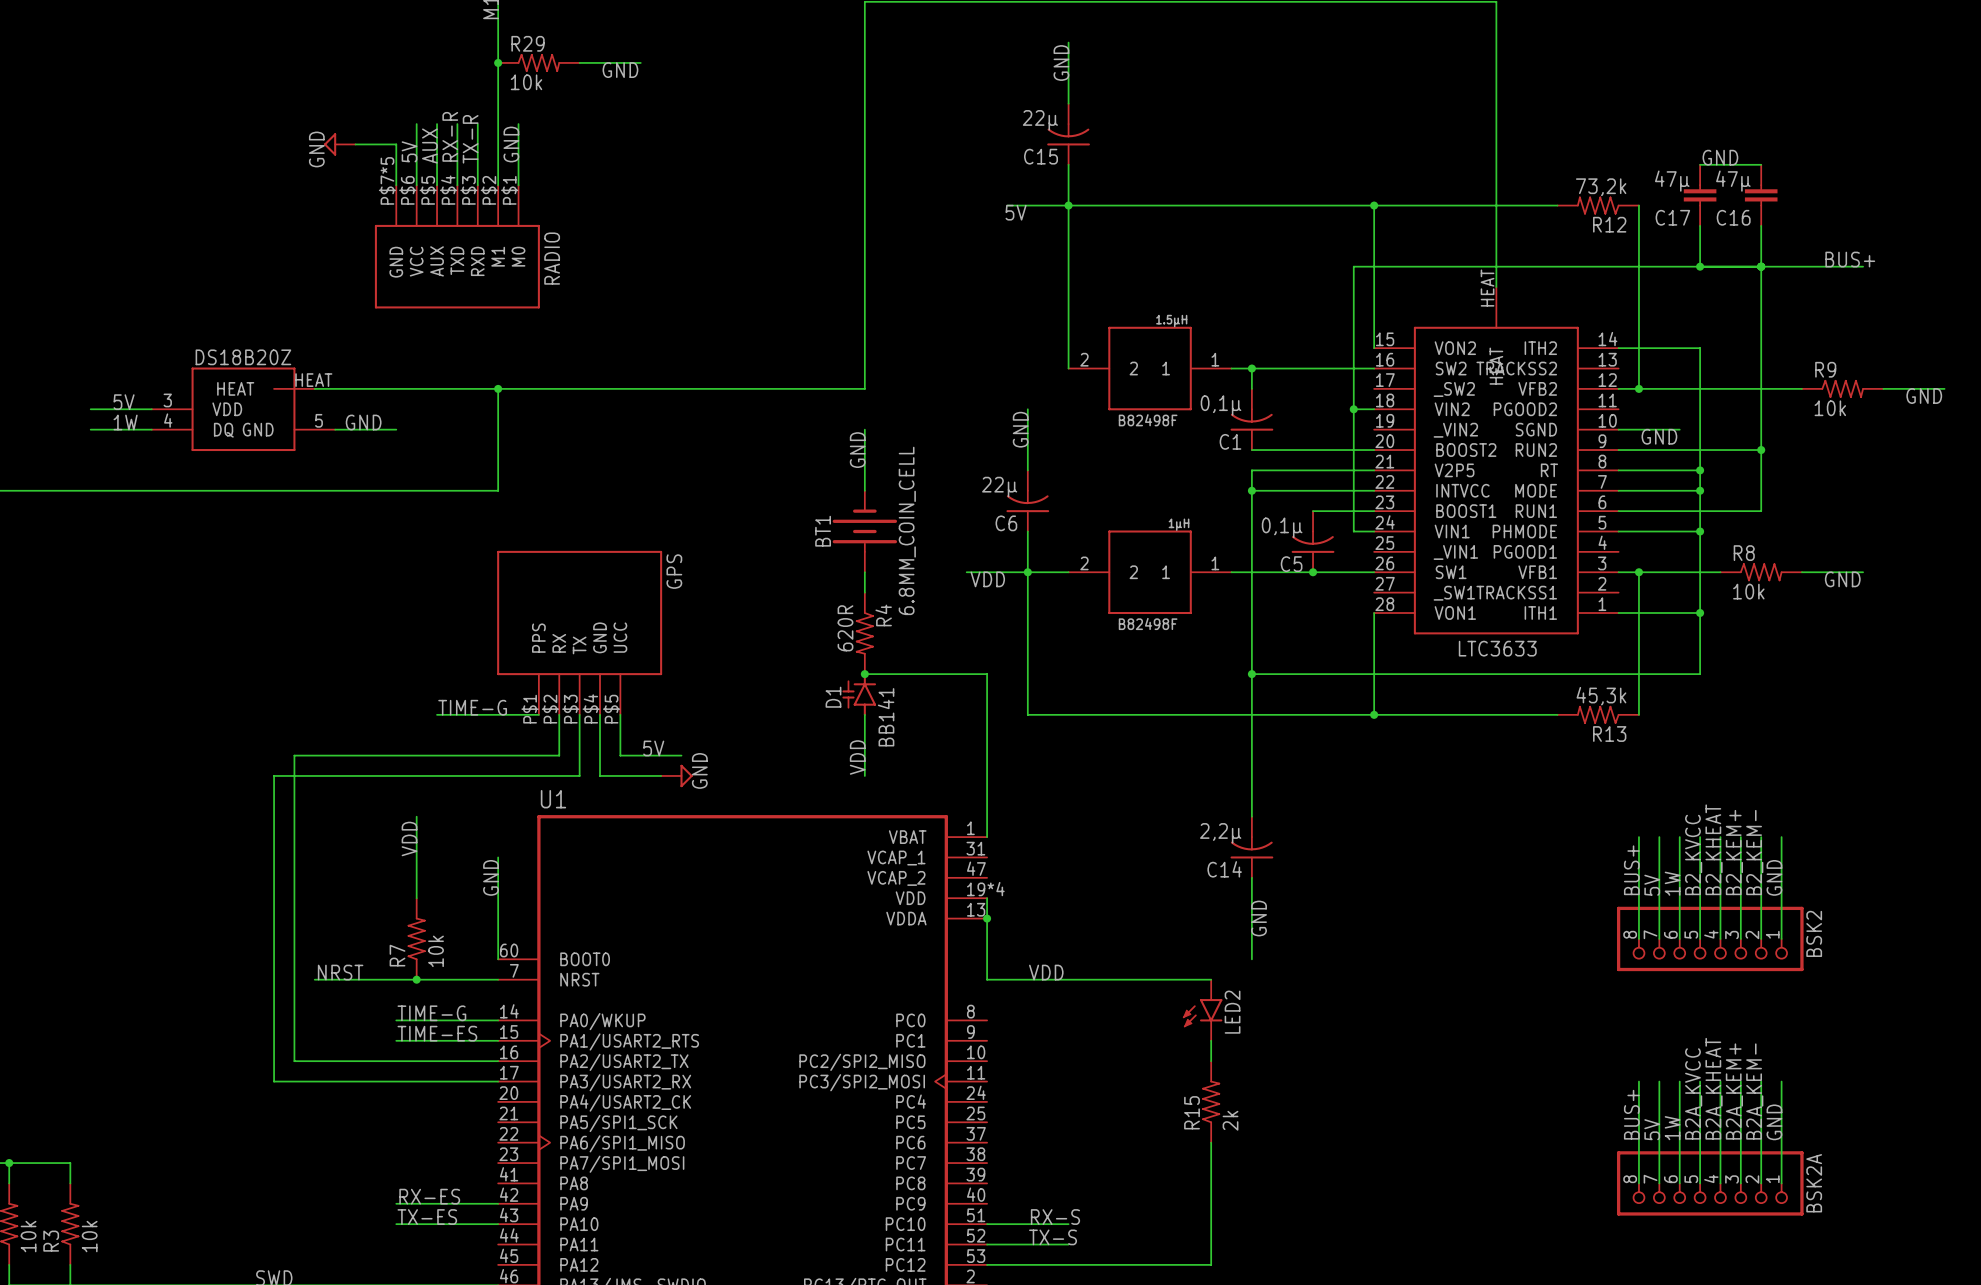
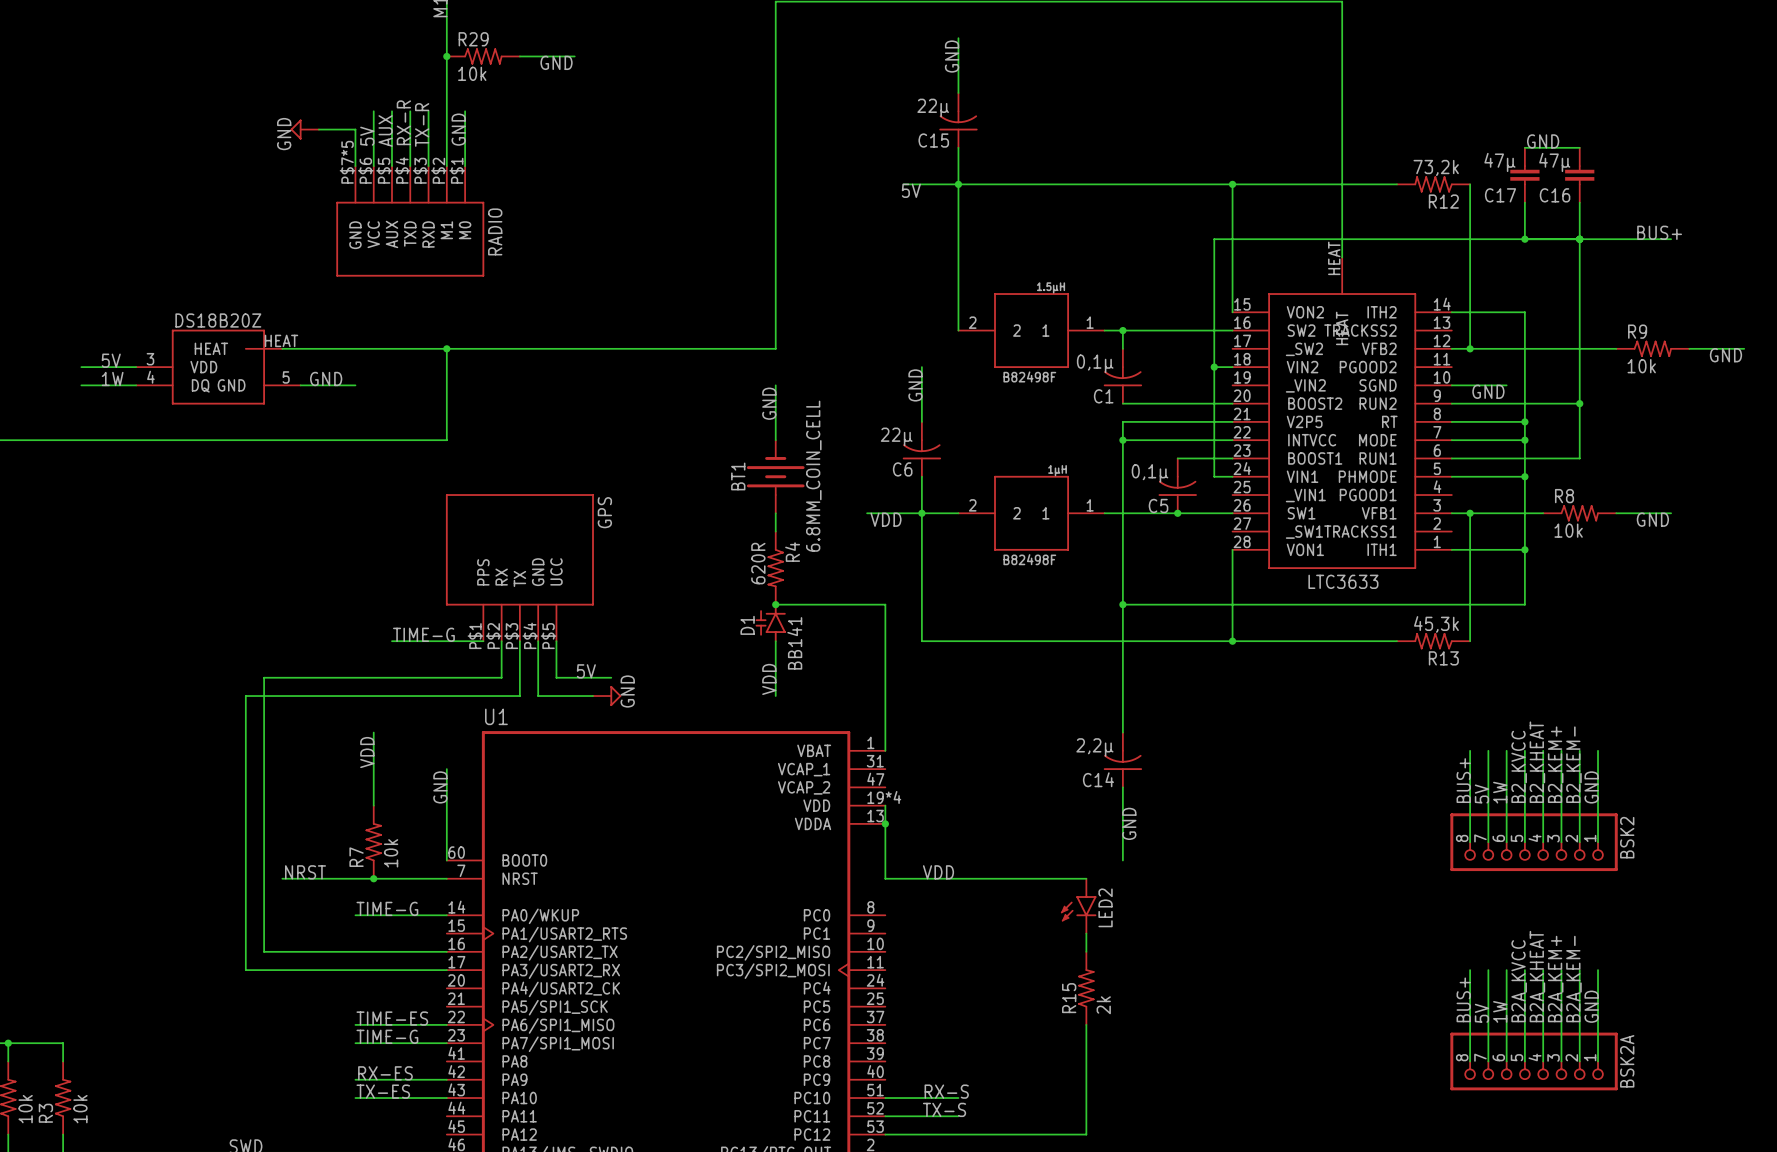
label position: TIME-ES (437, 1033) -> TIME-ES (392, 1018)
wire: (396, 1040) (498, 1040) -> (355, 1024) (446, 1024)
label: none -> TIME-G (387, 1036)
wire: none -> (355, 1043) (446, 1043)

